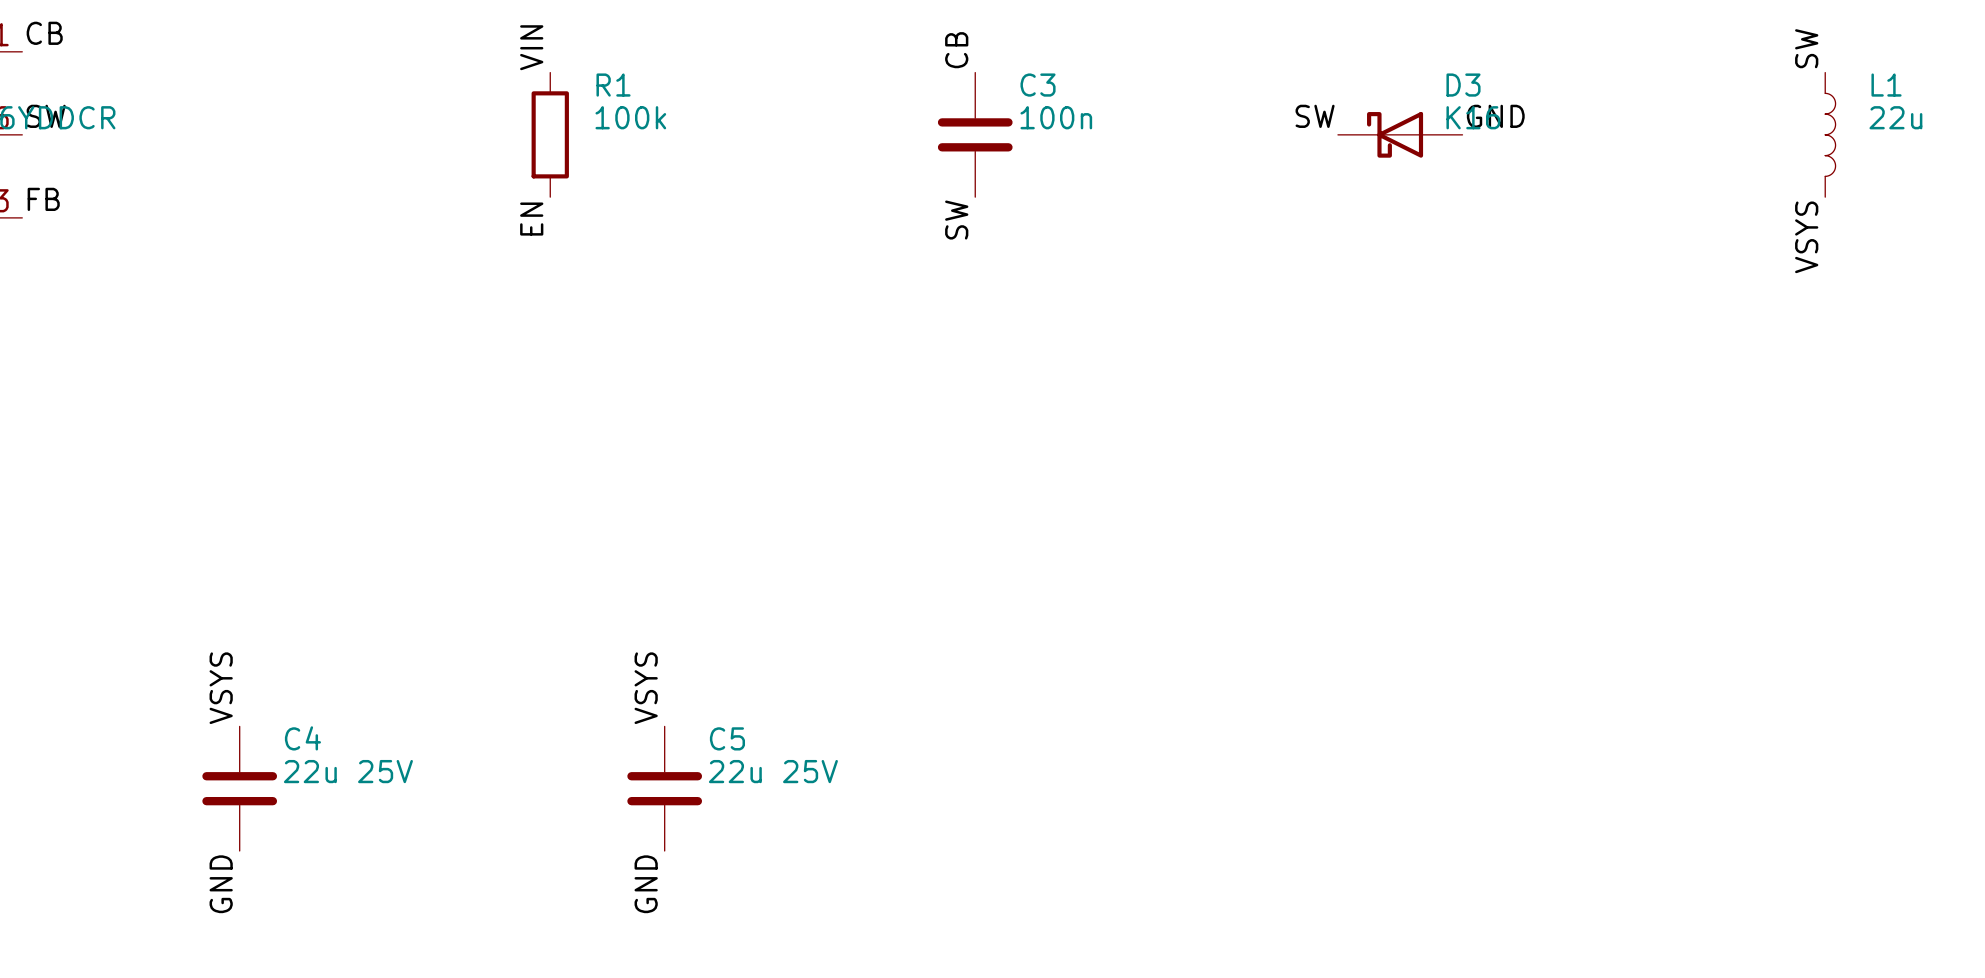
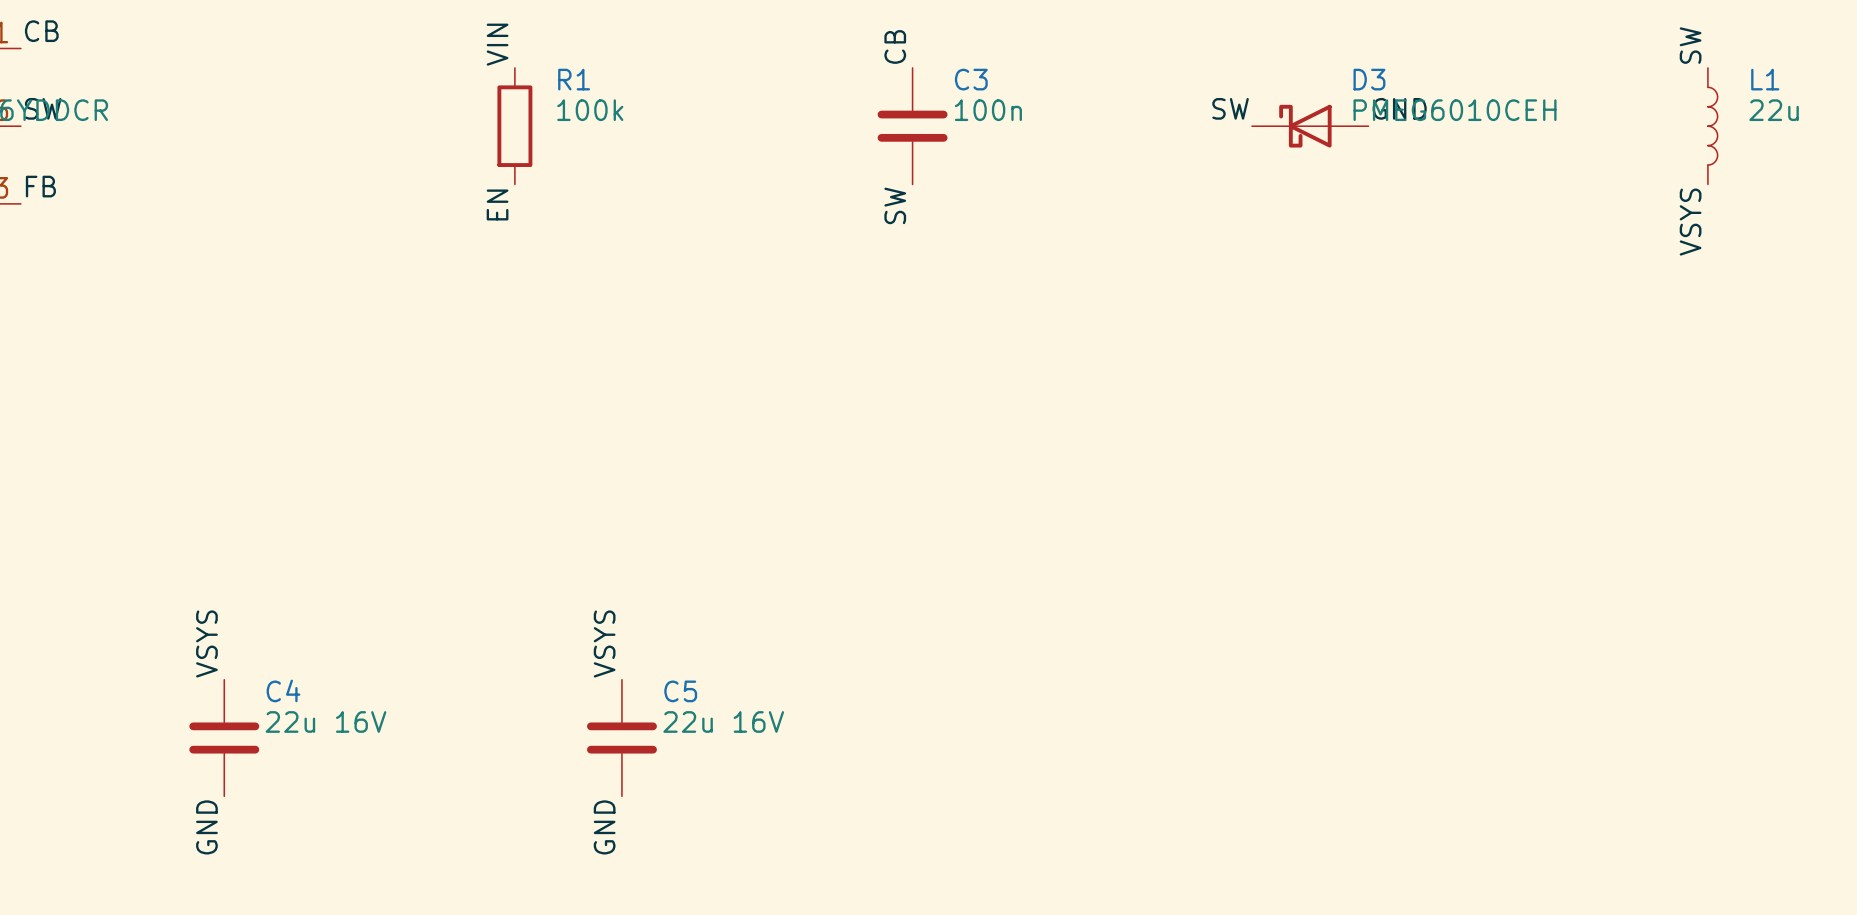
D3 value: K16 (1473, 117) -> PMEG6010CEH (1455, 110)
C4 value: 22u 25V (348, 771) -> 22u 16V (326, 721)
C5 value: 22u 25V (773, 771) -> 22u 16V (723, 721)

